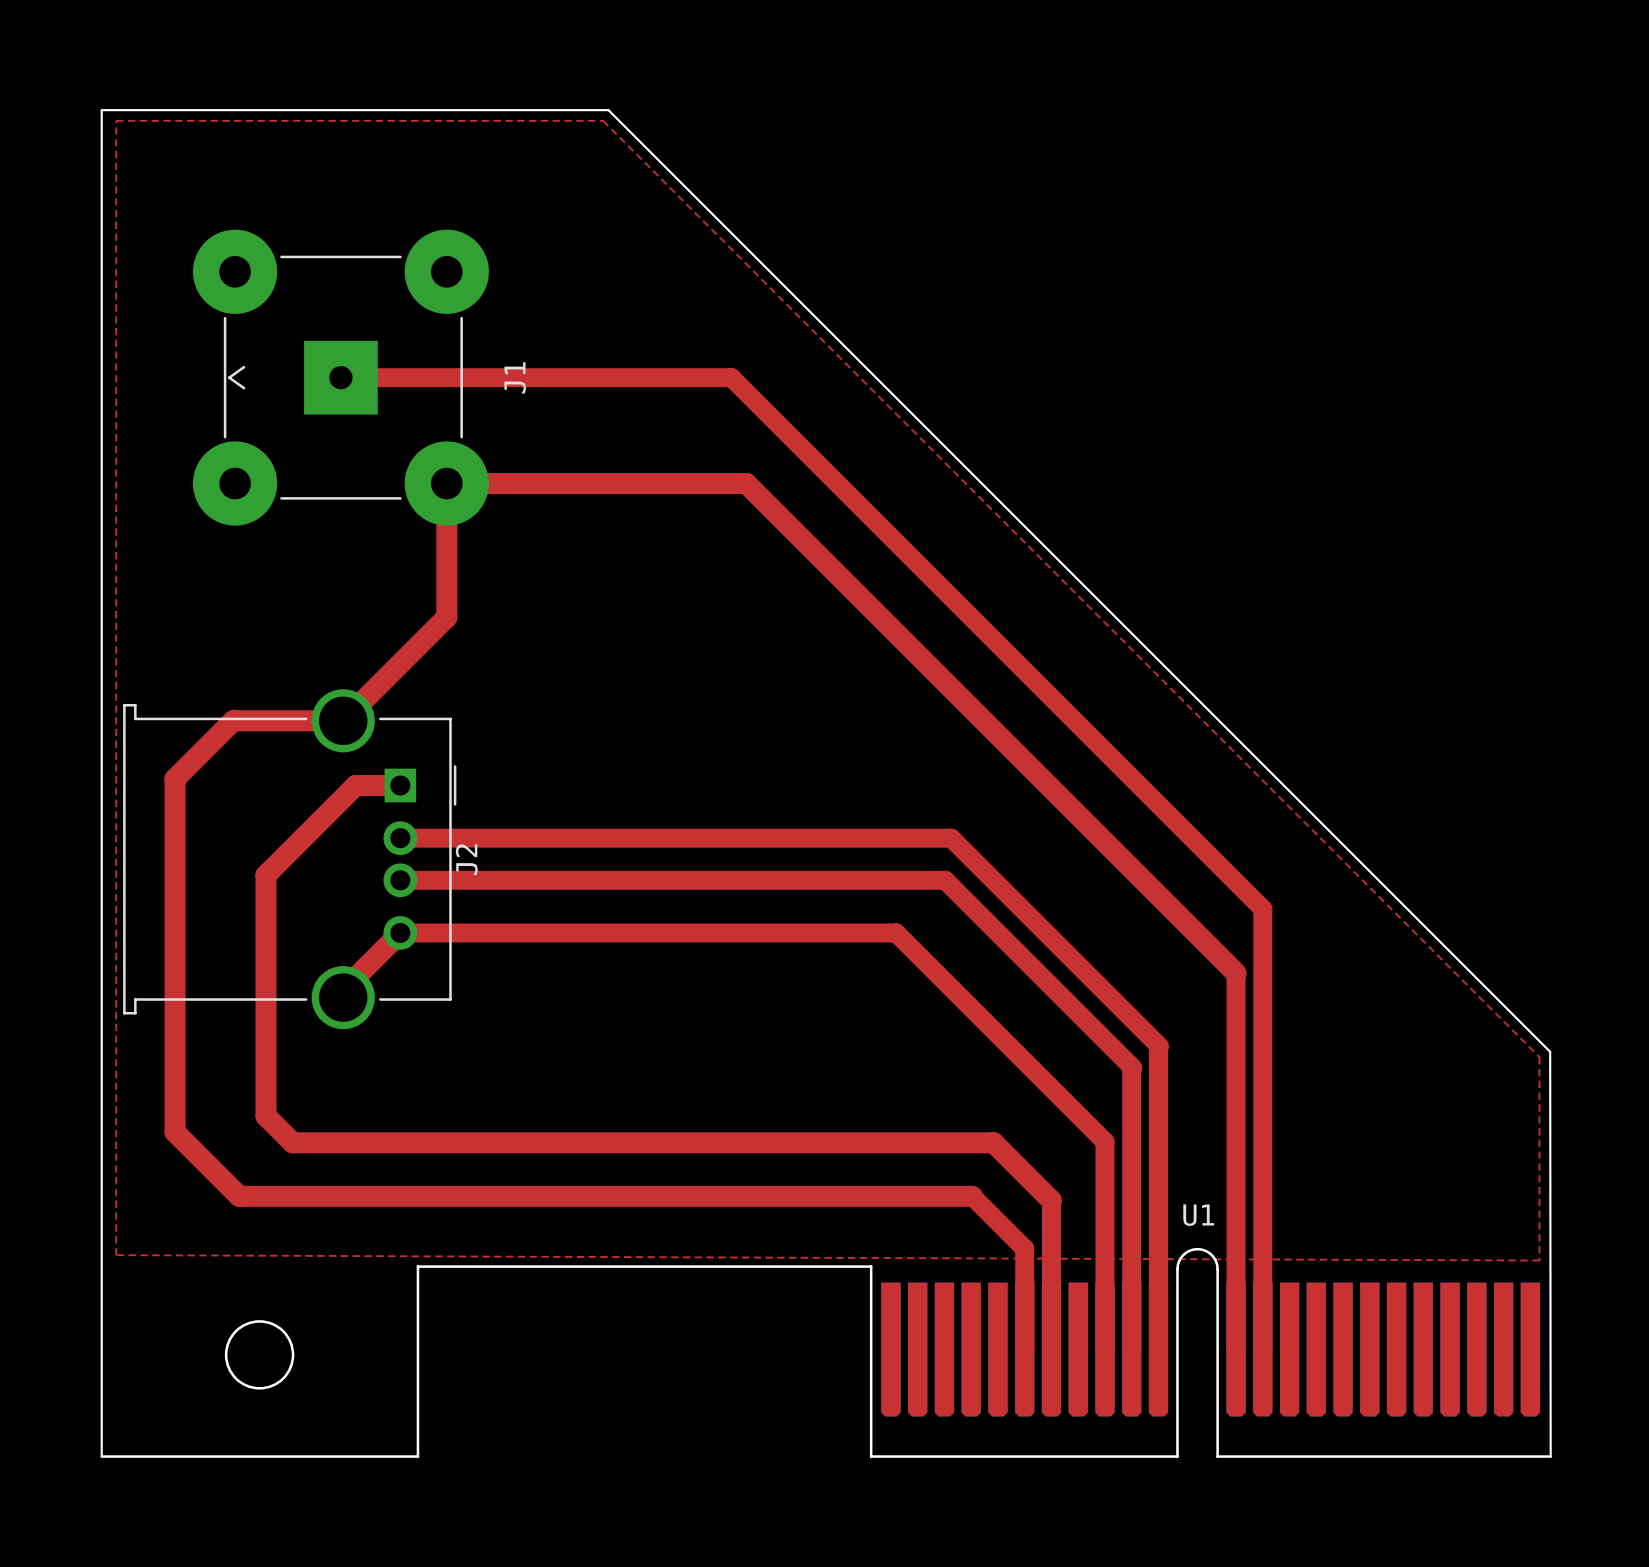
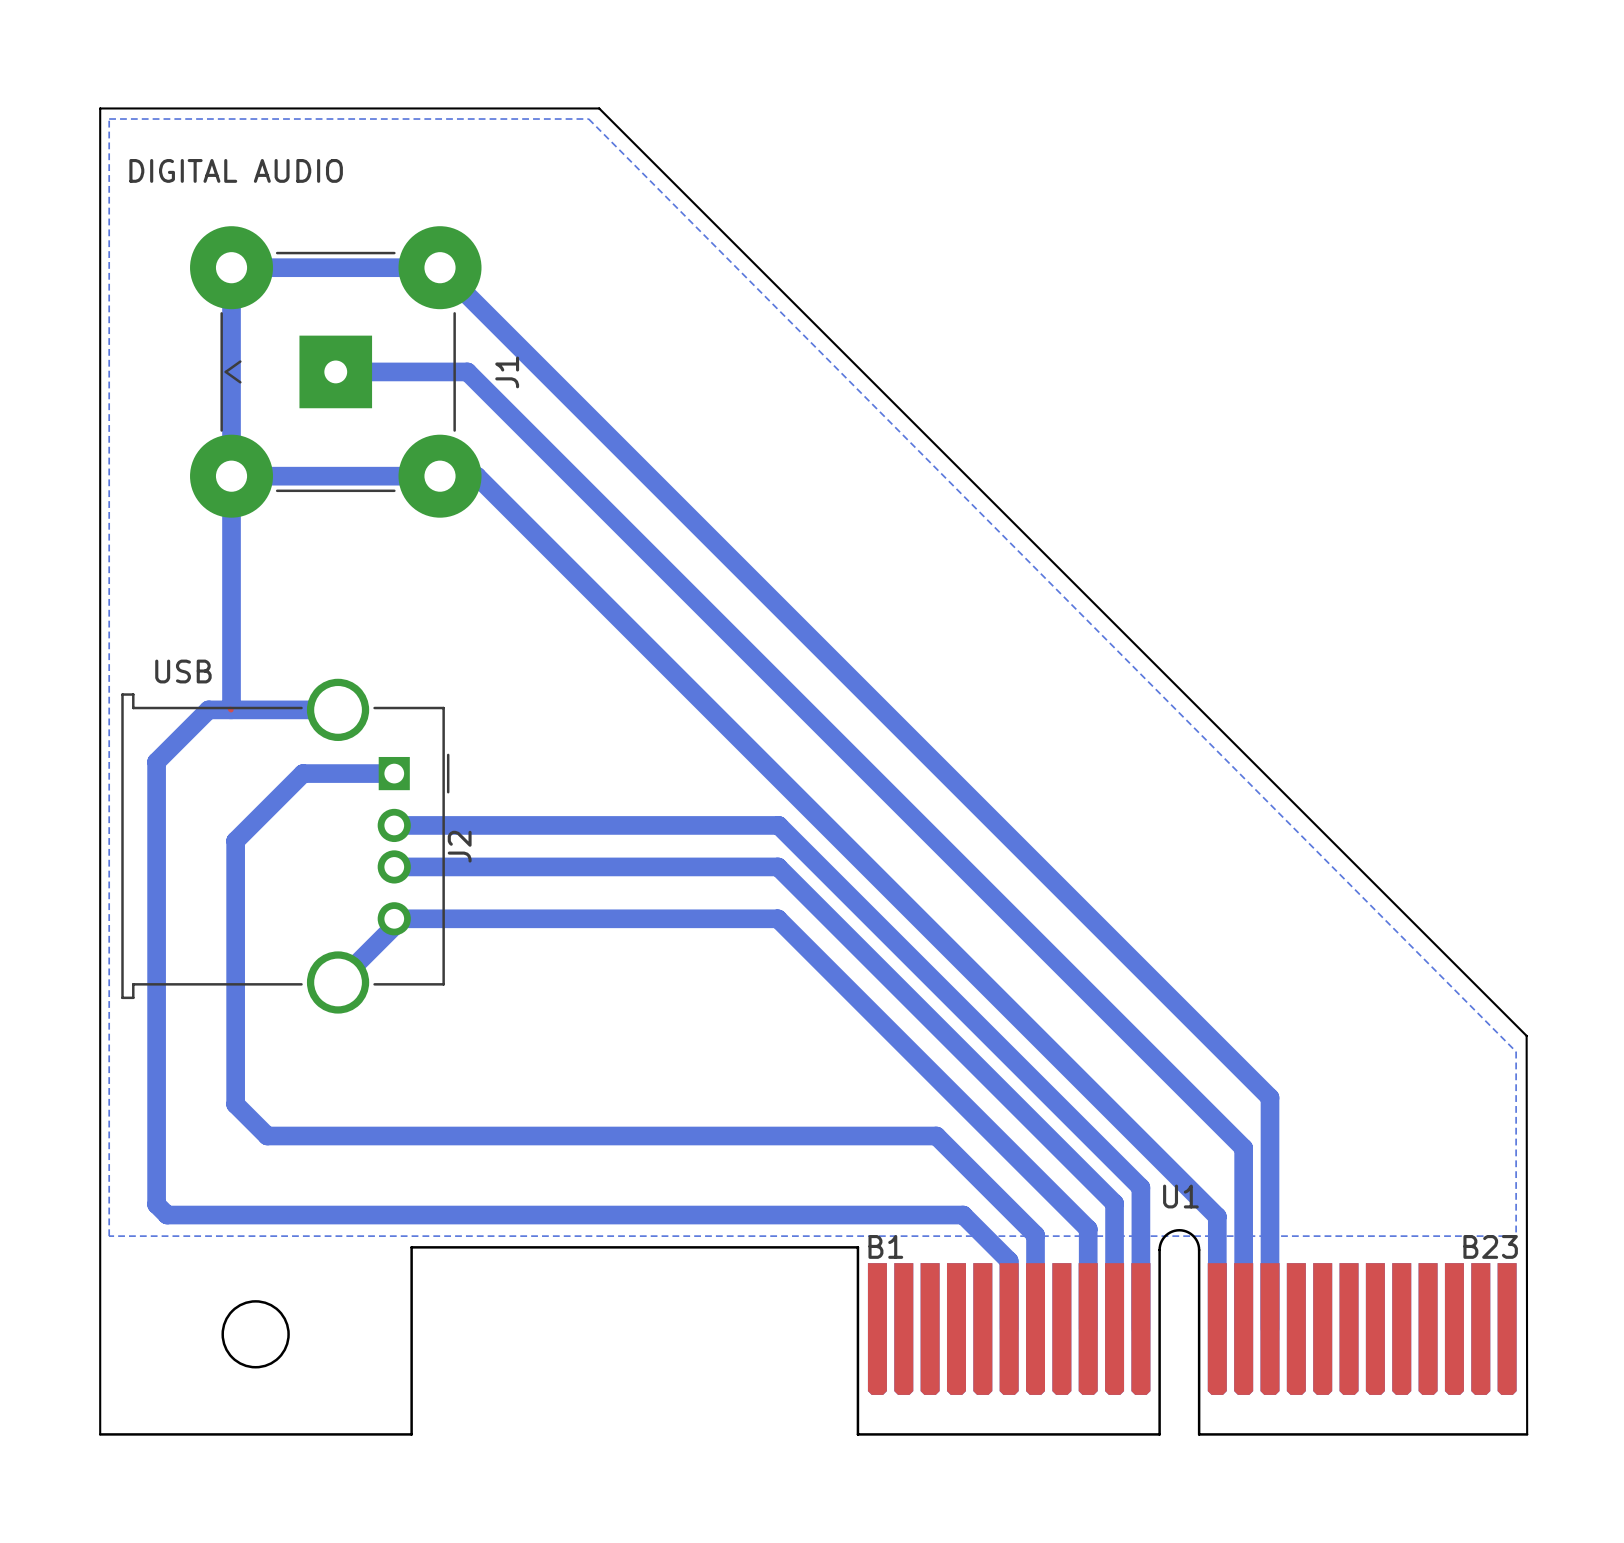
bottom zone outline: none -> (109, 119) (109, 1236) (1516, 1236) (1516, 1051) (588, 119) (109, 119)
top zone outline: (116, 120) (116, 1255) (1539, 1260) (1539, 1057) (603, 120) (116, 120) -> none
text: none -> DIGITAL AUDIO (236, 170)
top track: (340, 377) (731, 377) (1262, 908) (1262, 1349) -> none
bottom track: none -> (335, 371) (467, 371) (1243, 1148) (1243, 1329)
bottom track: none -> (231, 476) (476, 476) (1217, 1216) (1217, 1329)
text: none -> USB (183, 671)
top track: (233, 720) (175, 778) (175, 1132) (239, 1196) (972, 1196) (1024, 1248) (1024, 1349) -> none
top track: (234, 720) (343, 720) (446, 617) (446, 483) (746, 483) (1236, 973) (1236, 1349) -> none
bottom track: none -> (231, 709) (231, 267) (440, 267) (1270, 1097) (1270, 1329)
bottom track: none -> (338, 709) (208, 709) (156, 761) (156, 1204) (167, 1215) (963, 1215) (1009, 1260) (1009, 1329)
top track: (400, 785) (355, 785) (266, 875) (266, 1116) (292, 1142) (993, 1142) (1051, 1200) (1051, 1349) -> none
bottom track: none -> (394, 773) (302, 773) (235, 840) (235, 1104) (267, 1136) (936, 1136) (1035, 1235) (1035, 1329)
top track: (400, 838) (951, 838) (1159, 1046) (1158, 1349) -> none
bottom track: none -> (394, 825) (778, 825) (1140, 1187) (1140, 1329)
top track: (400, 880) (945, 880) (1132, 1067) (1131, 1349) -> none
bottom track: none -> (394, 866) (778, 866) (1114, 1203) (1114, 1329)
top track: (343, 990) (400, 932) (896, 932) (1104, 1141) (1104, 1349) -> none
bottom track: none -> (338, 982) (394, 926) (394, 918) (777, 918) (1088, 1229) (1088, 1329)
U1 text: none -> B1 (885, 1246)
U1 text: none -> B23 (1490, 1246)

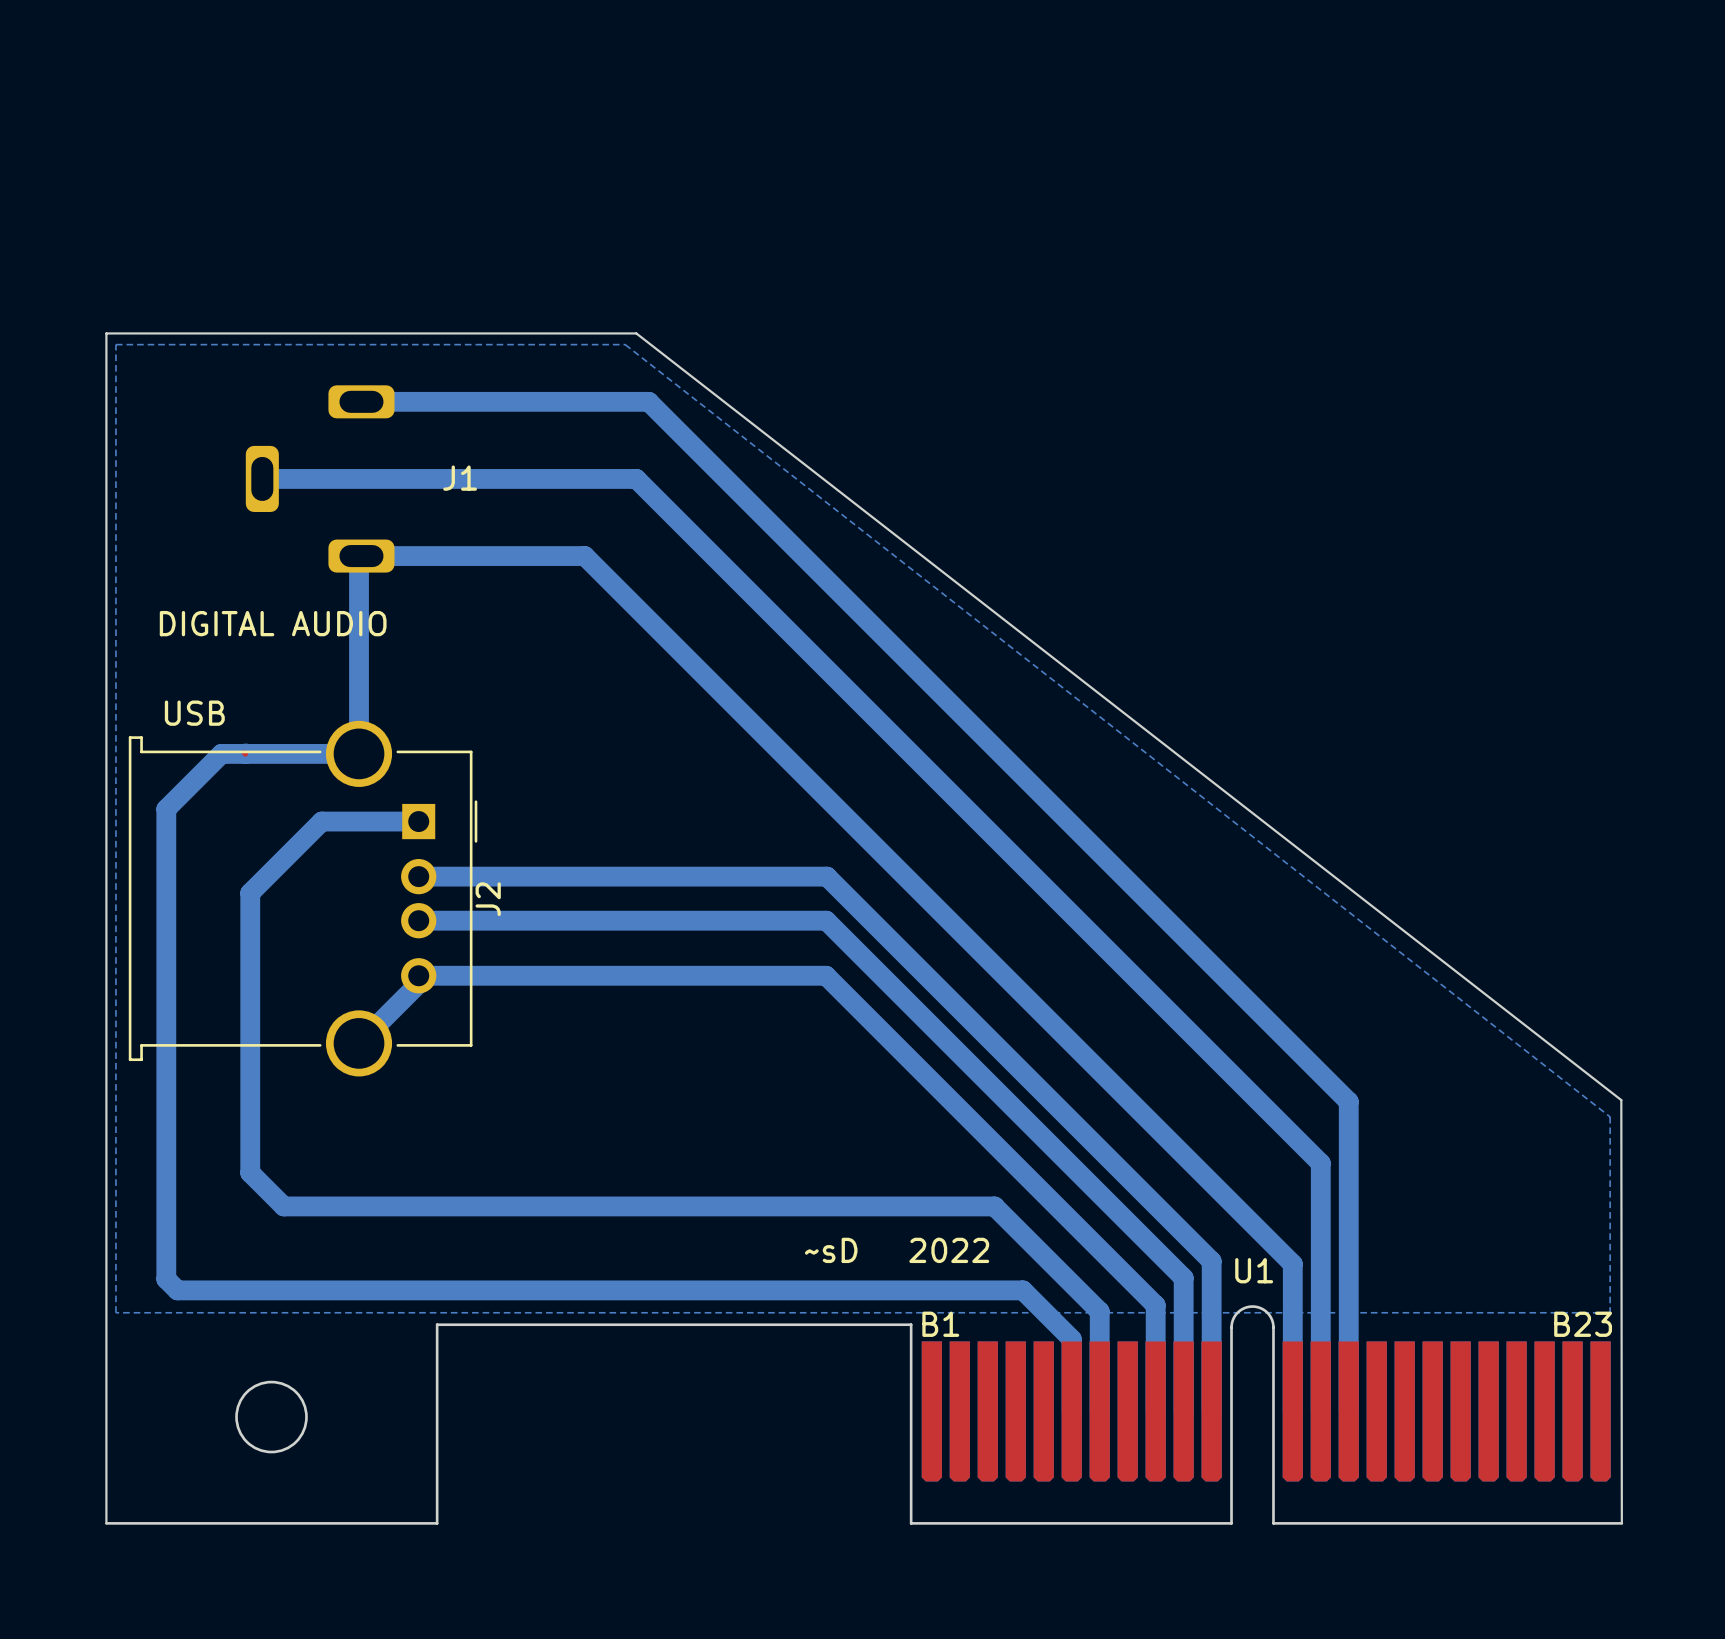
text position: DIGITAL AUDIO (236, 170) -> DIGITAL AUDIO (273, 623)
J1 footprint: [190, 226, 482, 518] -> [245, 385, 395, 573]
board edge: (100, 313) (100, 108) (599, 108) (1526, 1035) -> (106, 333) (636, 333) (1621, 1100)
bottom zone outline: (109, 324) (109, 119) (588, 119) (1516, 1051) -> (115, 344) (625, 344) (1610, 1116)
bottom track: (335, 371) (467, 371) (1243, 1148) -> (262, 478) (636, 478) (1320, 1163) (1320, 1219)
bottom track: (231, 476) (476, 476) (1217, 1216) -> (359, 753) (359, 558) (361, 556) (584, 556) (1292, 1264) (1292, 1292)
bottom track: (231, 709) (231, 267) (440, 267) (1270, 1097) -> (361, 401) (648, 401) (1348, 1101) (1348, 1165)
text: none -> ~sD (831, 1250)
text: none -> 2022 (949, 1250)

